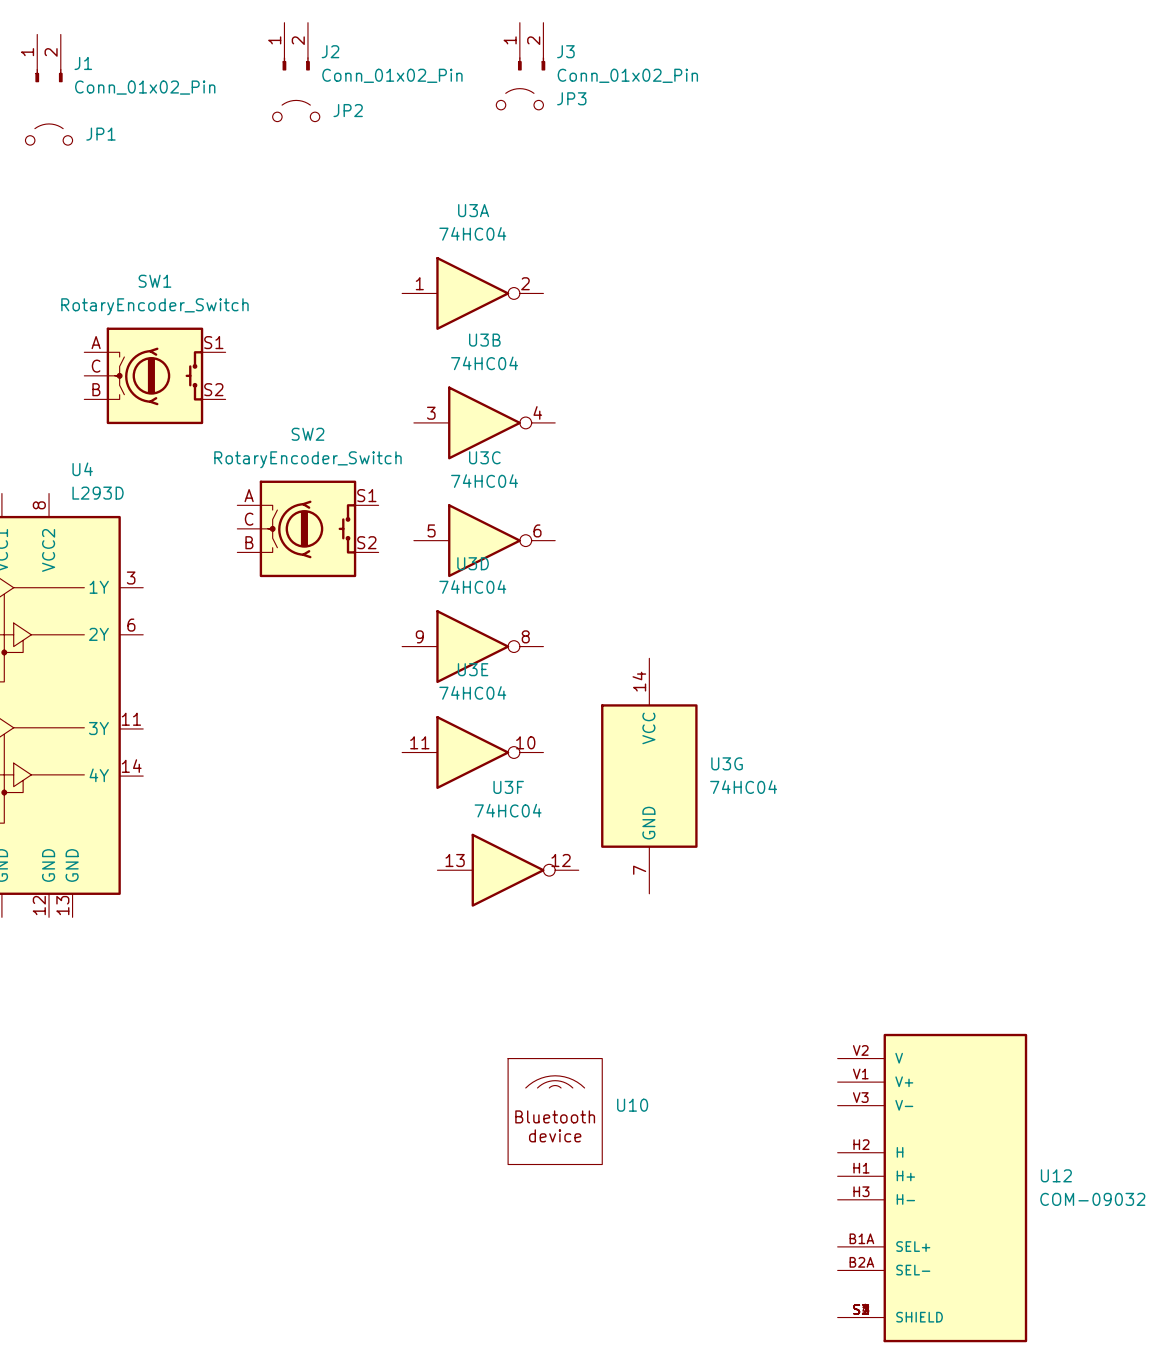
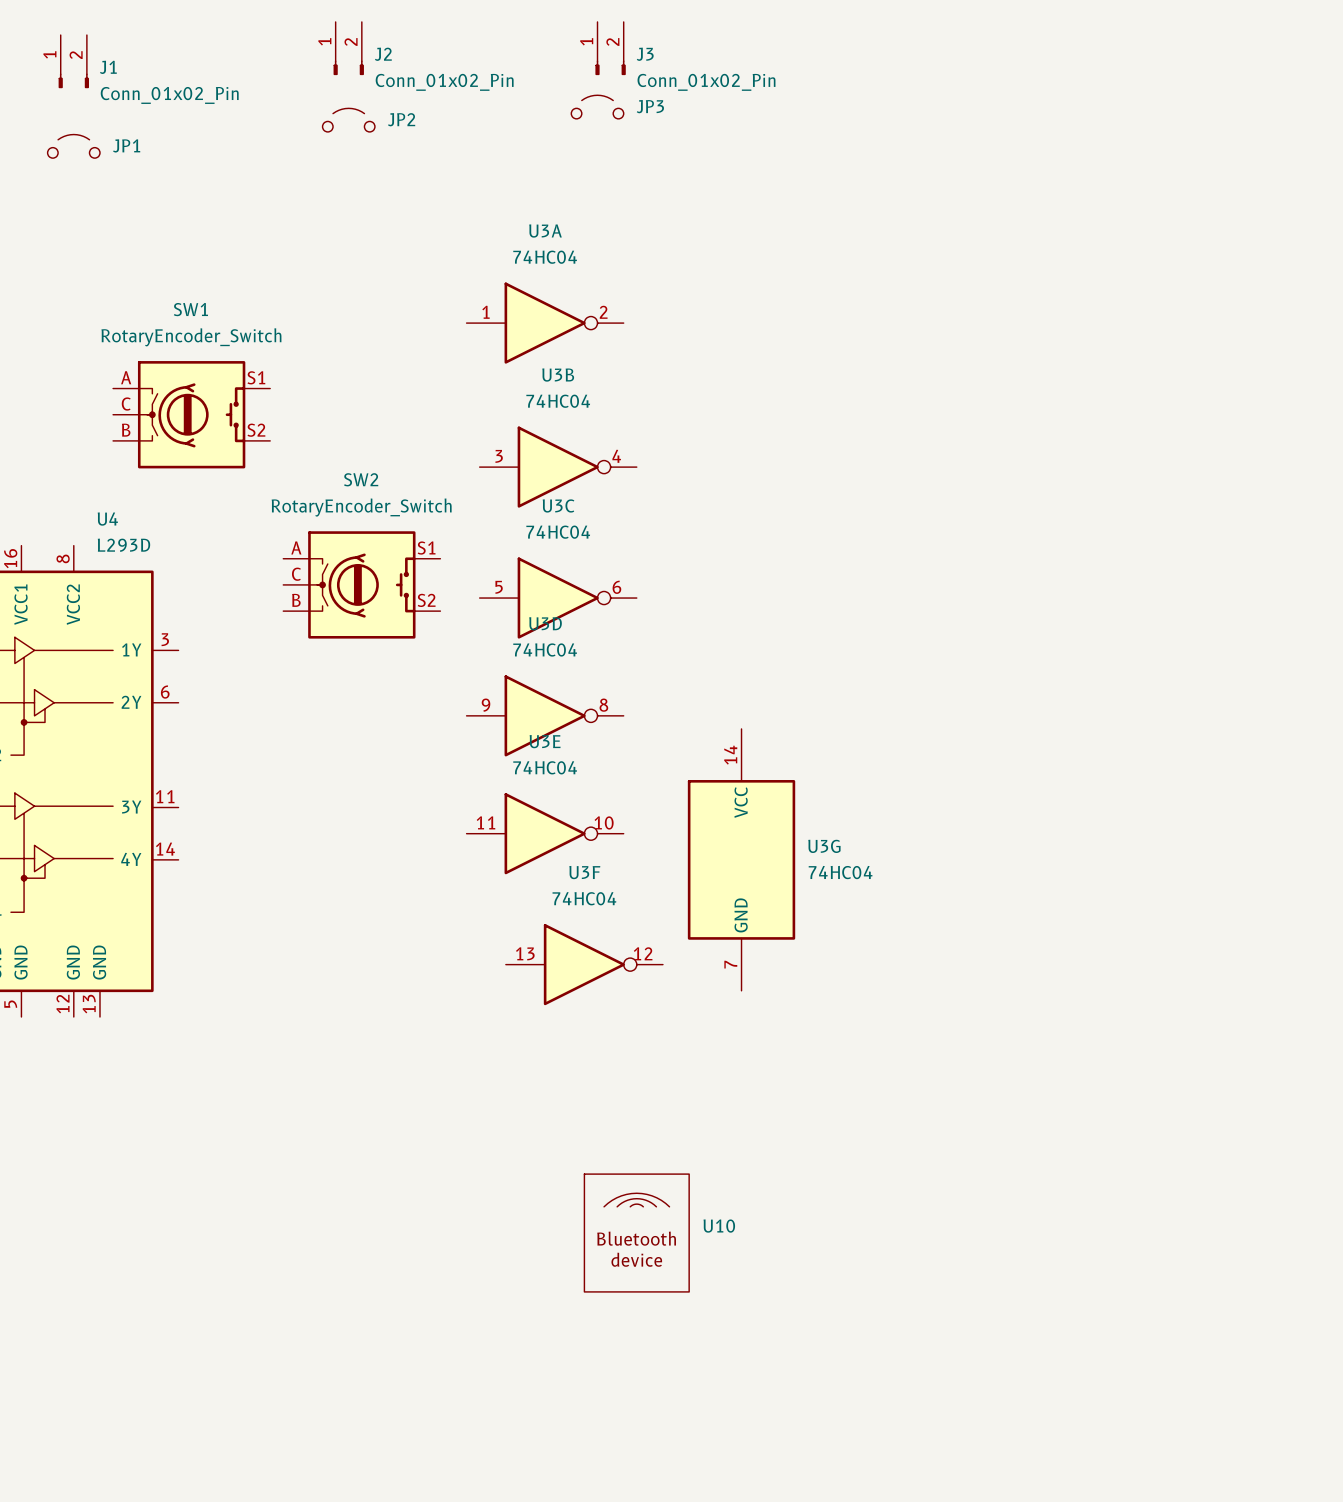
U12: COM-09032 (932, 1188) -> none

